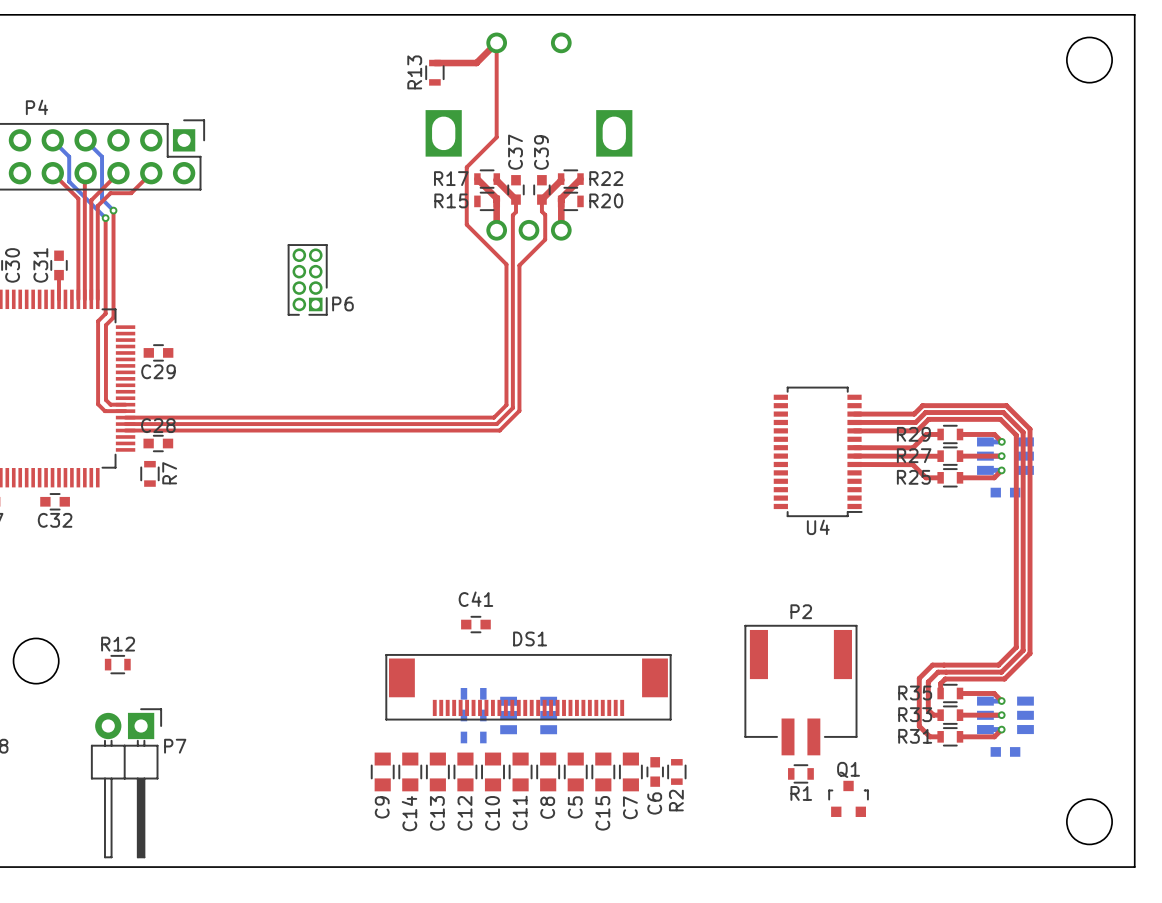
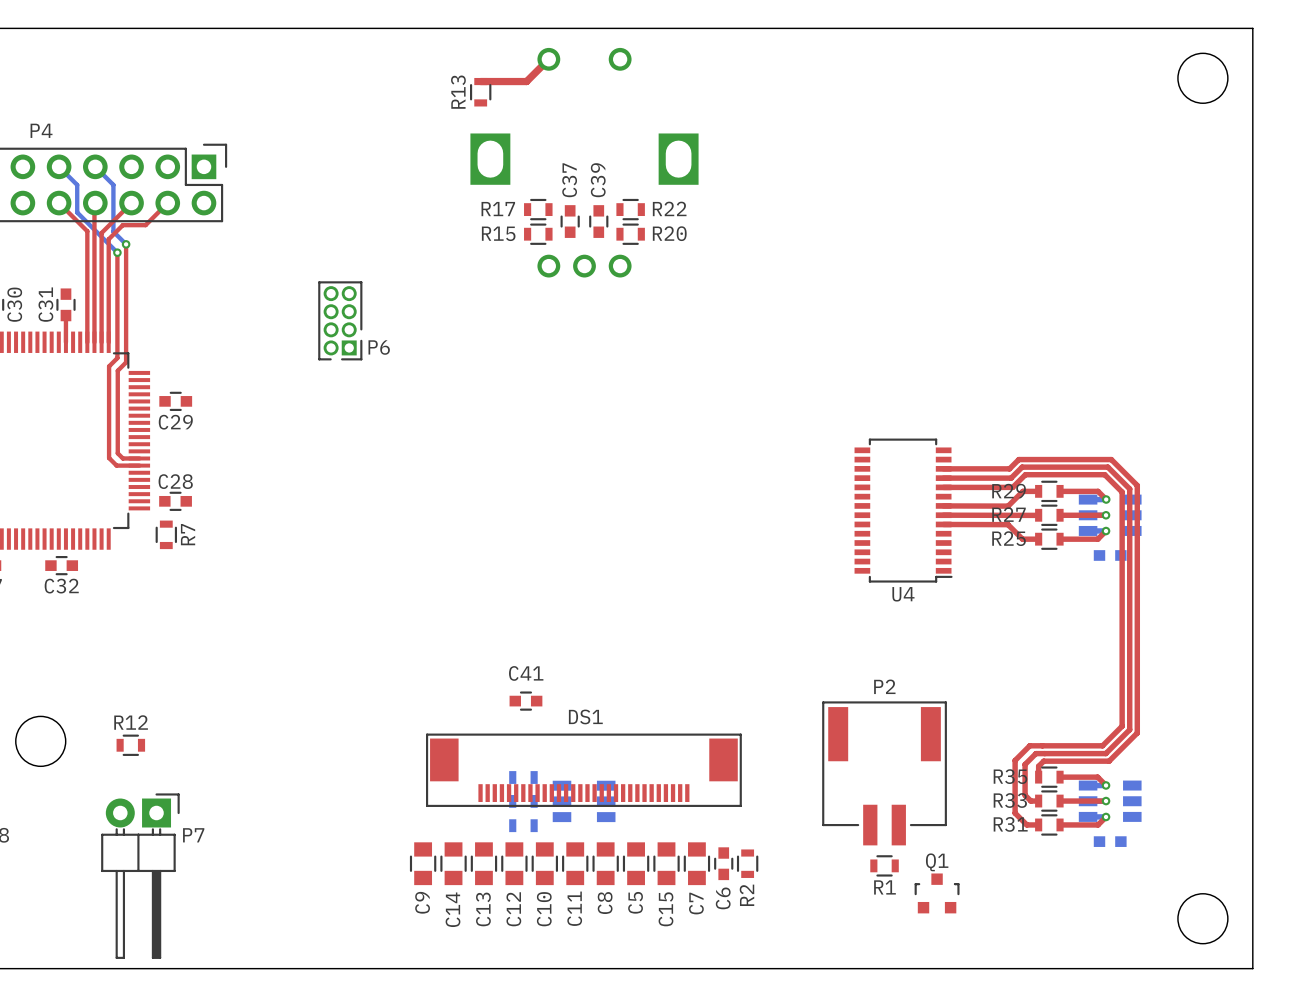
top track: (496, 42) (496, 137) (466, 167) (466, 224) (506, 264) (506, 405) (493, 417) (125, 417) -> none
top track: (477, 179) (496, 198) (496, 201) -> none
top track: (496, 179) (515, 199) (515, 212) (512, 215) (512, 408) (496, 424) (125, 424) -> none
top track: (561, 179) (541, 199) (541, 211) (545, 214) (545, 239) (519, 265) (519, 410) (499, 430) (125, 430) -> none
top track: (580, 179) (561, 198) (561, 201) -> none
top track: (496, 201) (496, 230) -> none
top track: (561, 201) (561, 230) -> none

